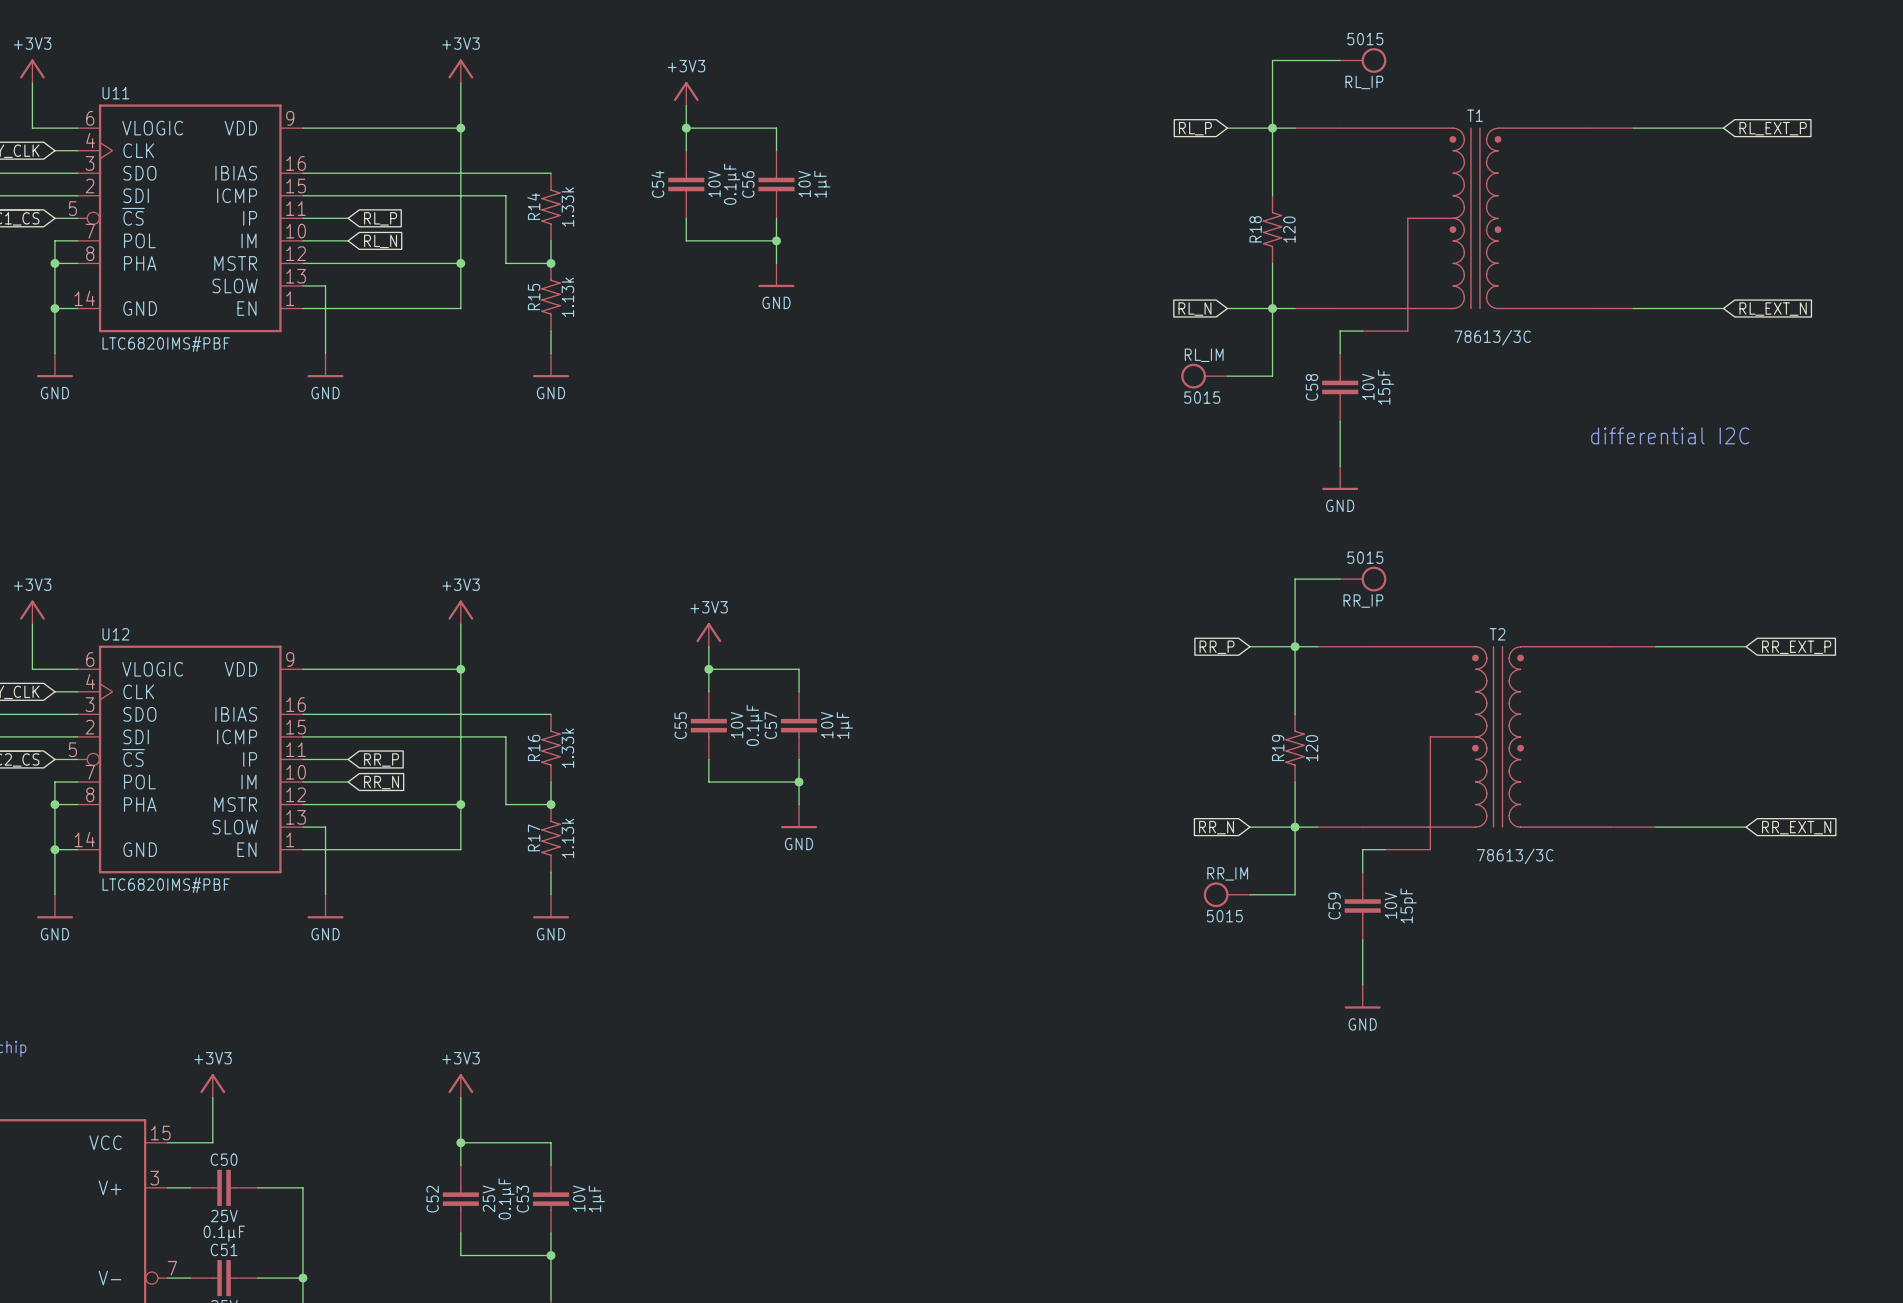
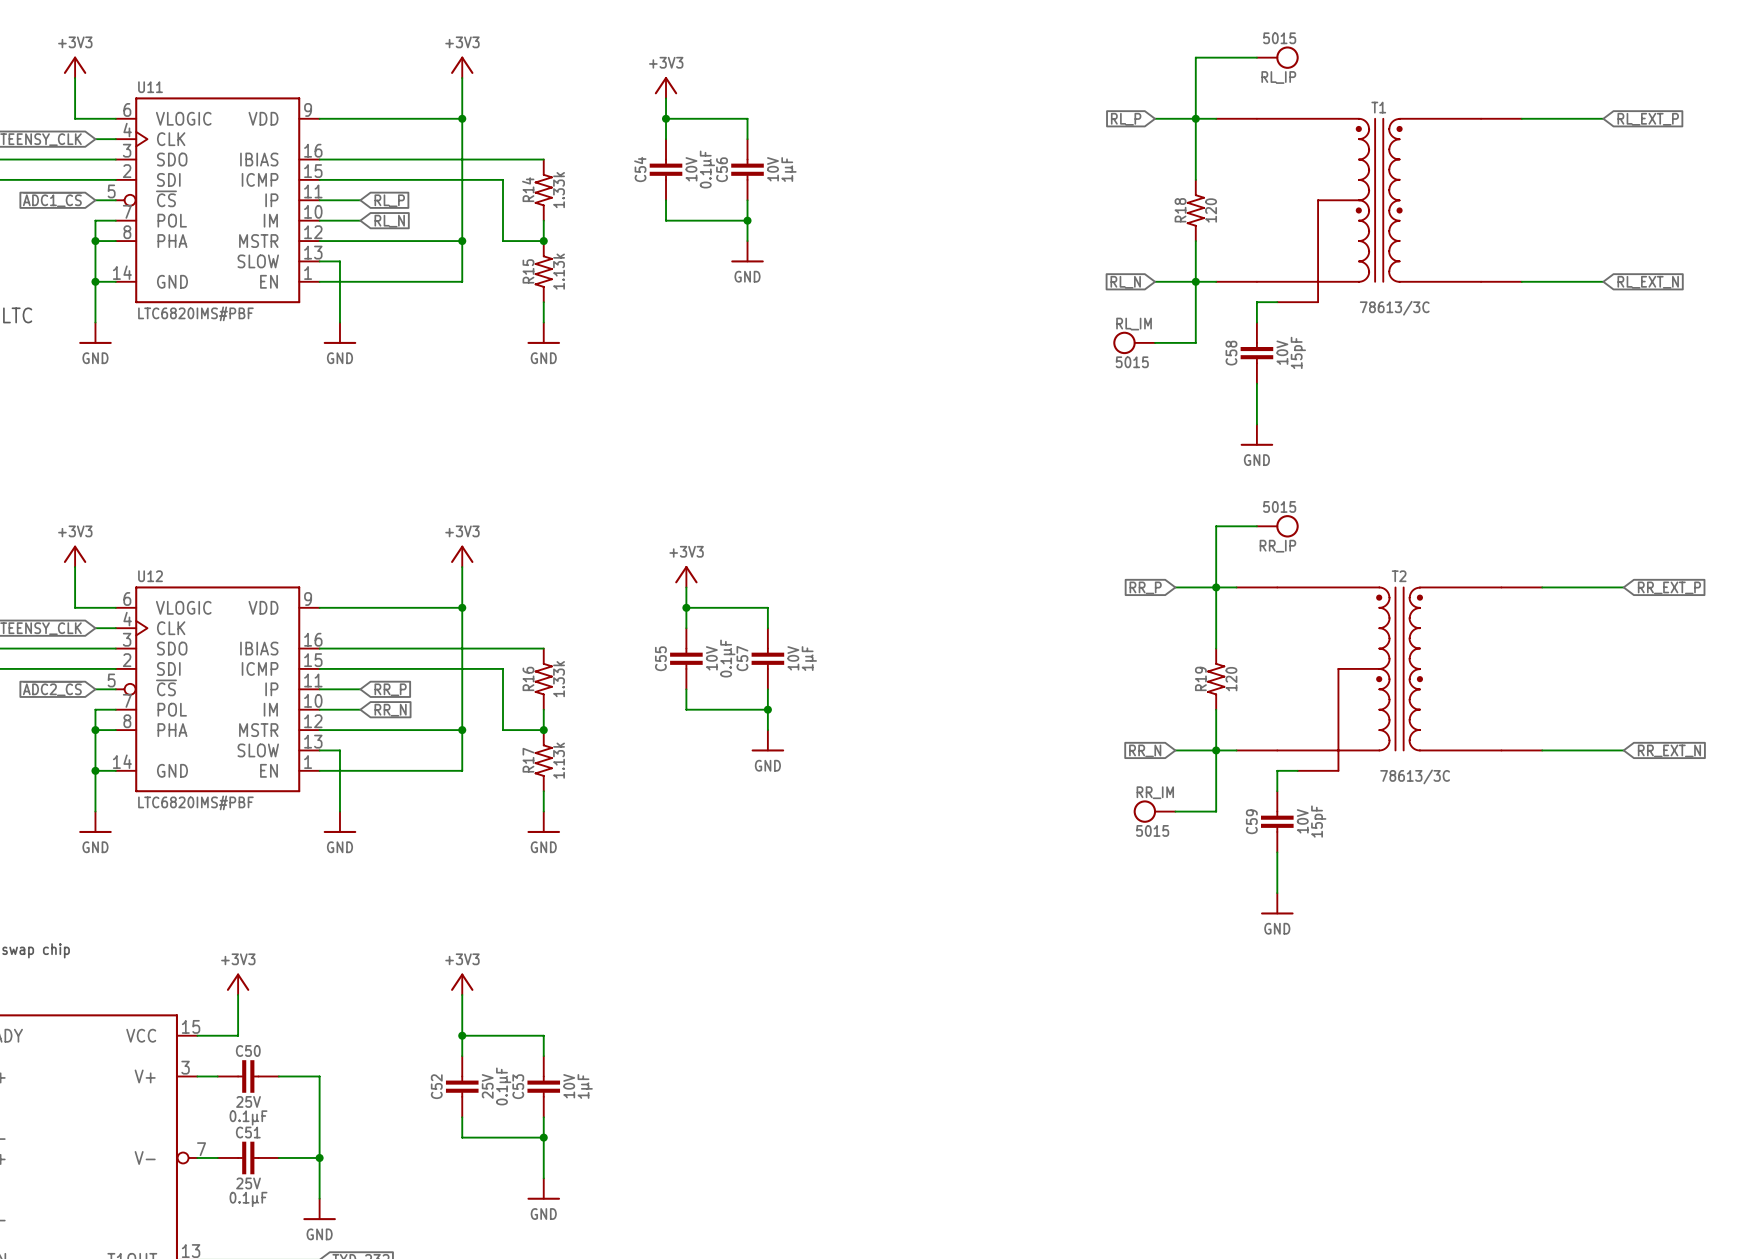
text: differential I2C (1670, 435) -> none

